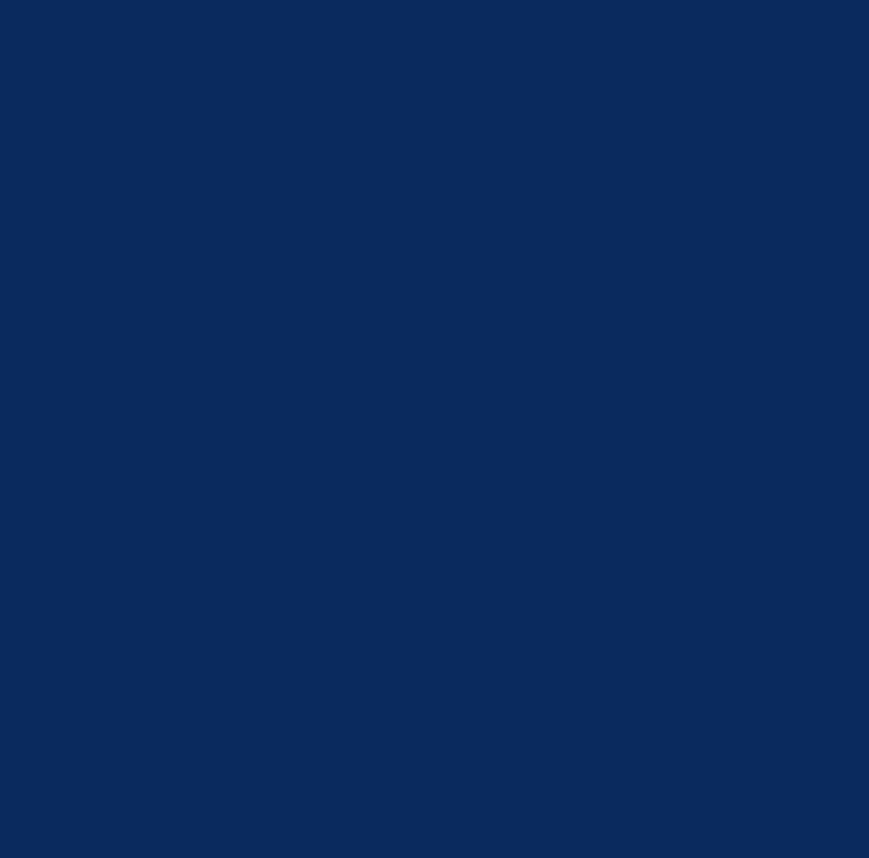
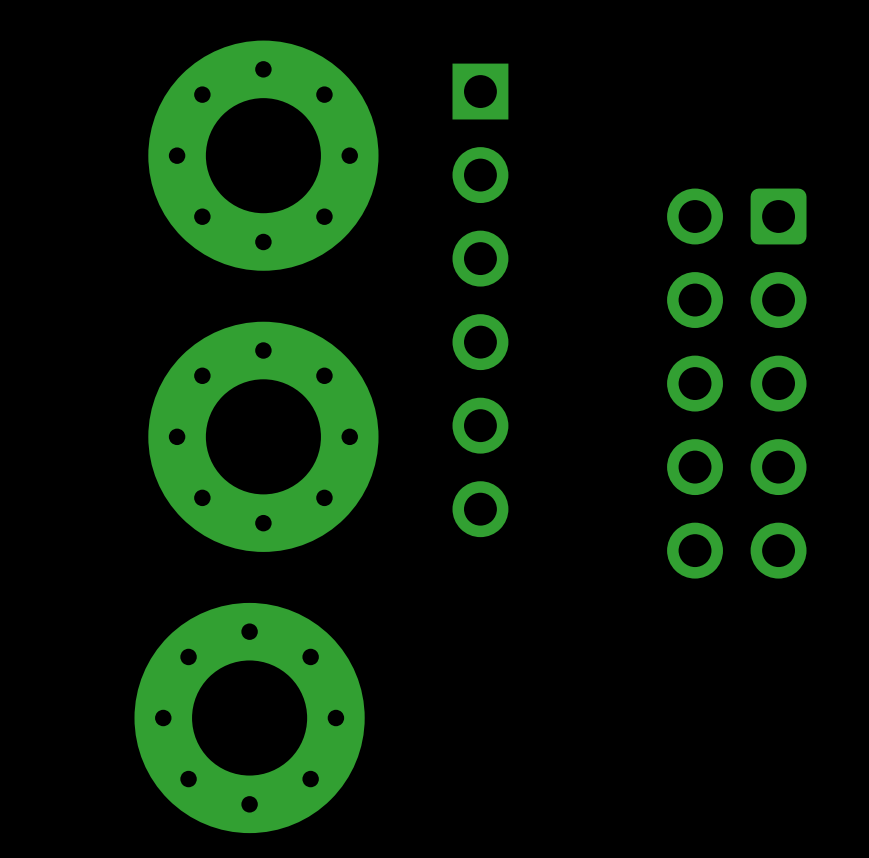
part: none -> (263, 155)
part: none -> (480, 300)
part: none -> (736, 383)
part: none -> (263, 436)
part: none -> (249, 718)

